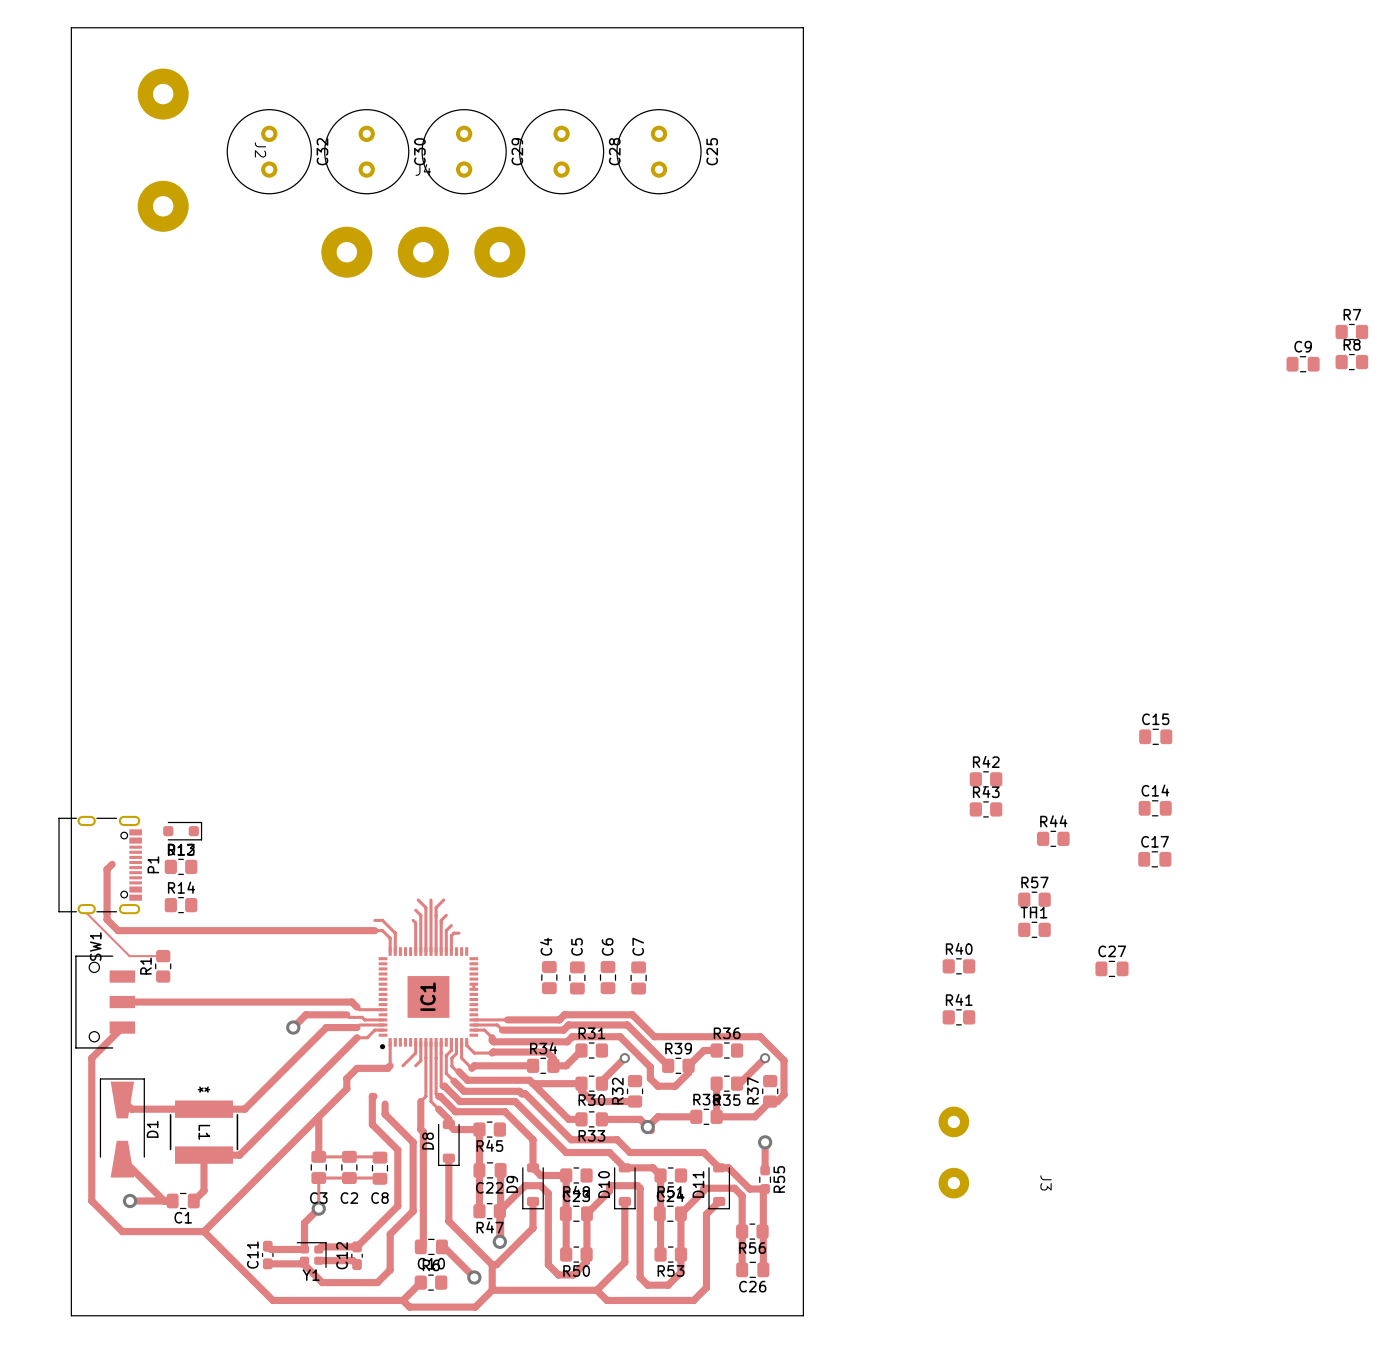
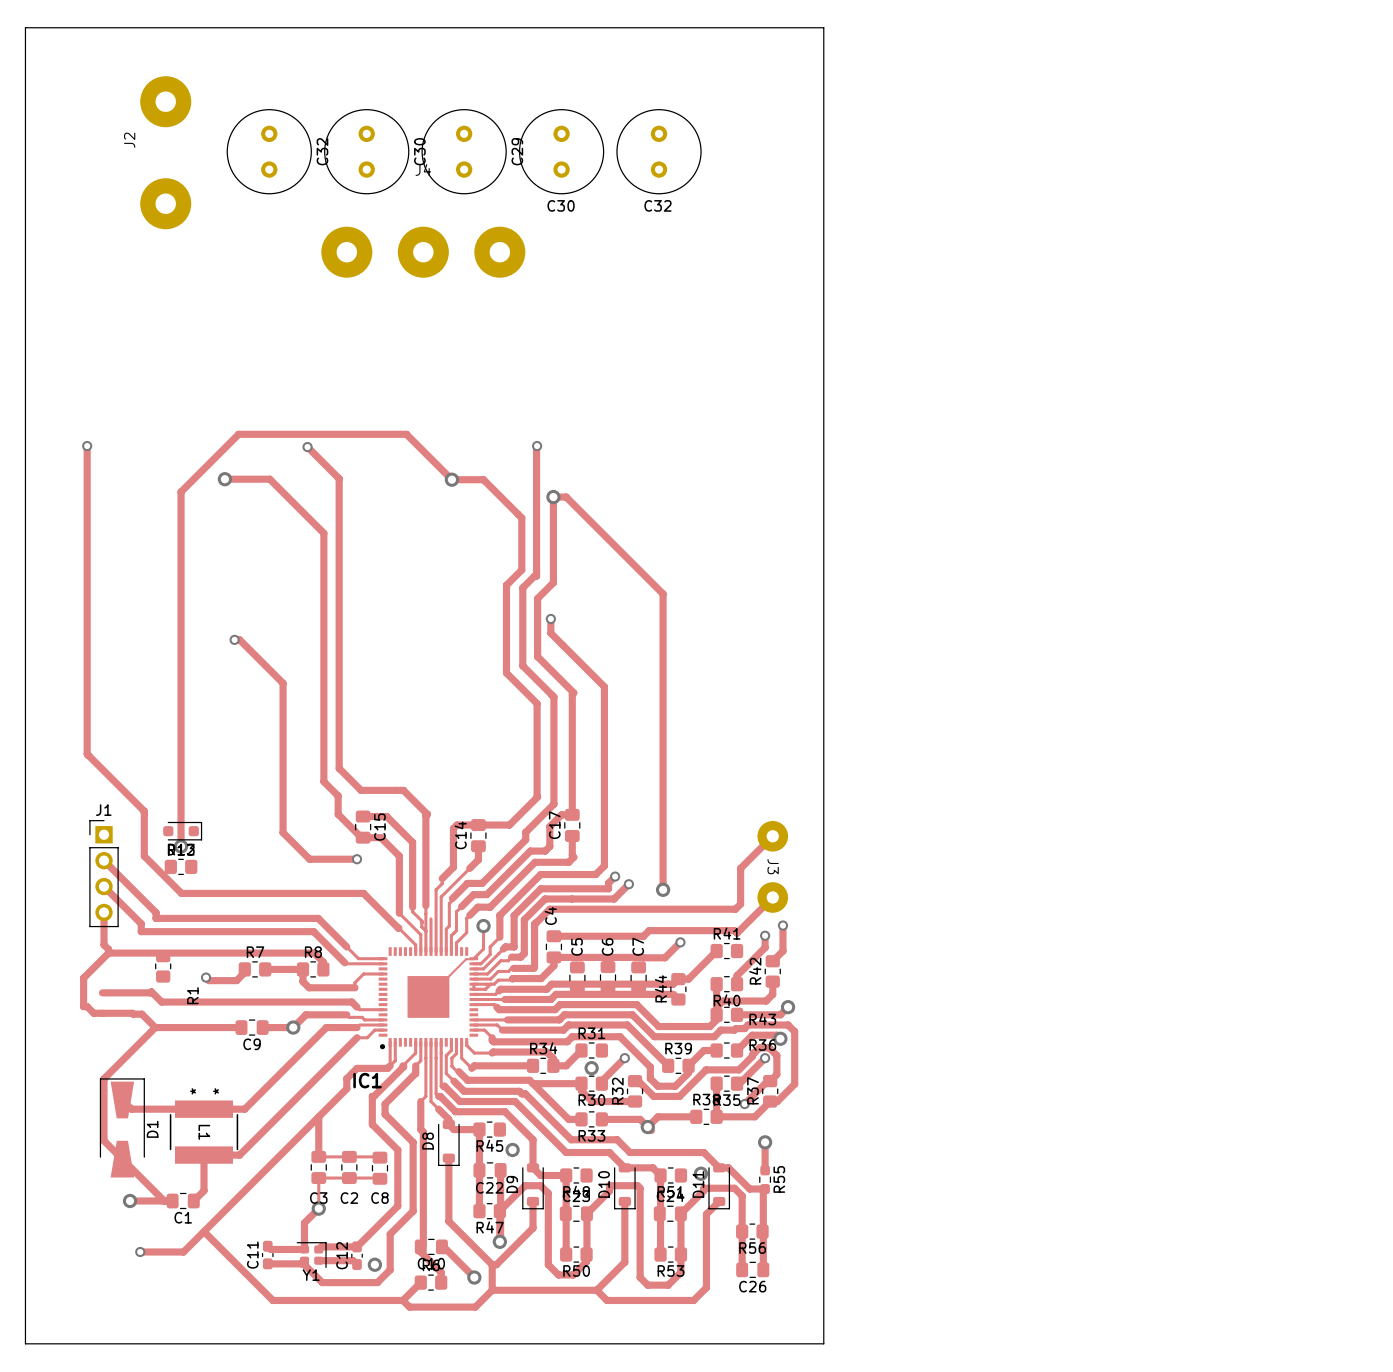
board edge: (71, 27) (71, 1315) (803, 1315) (803, 27) -> (71, 27) (25, 27) (25, 1343) (823, 1343) (823, 27) (803, 27)
J2 footprint: [137, 68, 189, 232] -> [140, 76, 192, 230]
J2 name rotation: 0° (260, 149) -> 180° (129, 140)
J2 name position: J2 (260, 149) -> J2 (129, 140)
C28 name: C28 (614, 151) -> C30 (561, 205)
C25 name: C25 (712, 151) -> C32 (657, 205)
R7 position: (1351, 331) -> (255, 969)
C9 name position: C9 (1303, 346) -> C9 (252, 1044)
R8 position: (1351, 362) -> (313, 969)
C9 position: (1303, 364) -> (252, 1027)
via: none -> (87, 446)
via: none -> (537, 446)
via: none -> (307, 447)
via: none -> (224, 479)
via: none -> (451, 479)
via: none -> (553, 497)
track: none -> (550, 618) (550, 633) (604, 686) (604, 865) (595, 874) (540, 874) (499, 915) (499, 937) (490, 946) (490, 954) (480, 963) (473, 963)
via: none -> (550, 618)
track: none -> (234, 639) (239, 639) (283, 683) (283, 832) (309, 859) (357, 859)
via: none -> (234, 639)
C15 rotation: 0° (1155, 736) -> 90° clockwise (363, 827)
C15 position: (1155, 736) -> (363, 827)
R42 name position: R42 (986, 761) -> R42 (755, 971)
R42 rotation: 0° (986, 779) -> 90° clockwise (772, 971)
R42 position: (986, 779) -> (772, 971)
C14 name position: C14 (1155, 790) -> C14 (460, 835)
R43 name position: R43 (986, 791) -> R43 (762, 1019)
C14 rotation: 0° (1155, 808) -> 90° clockwise (478, 835)
C14 position: (1155, 808) -> (478, 835)
R43 position: (986, 809) -> (726, 1014)
track: none -> (363, 816) (386, 816) (412, 842) (412, 911) (422, 921) (421, 927) (425, 931)
R44 name position: R44 (1053, 821) -> R44 (660, 988)
track: none -> (572, 836) (573, 857) (568, 862) (535, 862) (490, 907) (477, 907) (466, 918) (466, 932) (456, 942) (456, 951)
track: none -> (772, 836) (740, 868) (740, 904) (735, 909) (549, 909) (534, 924) (533, 968) (511, 968) (508, 971) (498, 971) (490, 979) (473, 979)
R44 rotation: 0° (1053, 838) -> 90° clockwise (678, 989)
R44 position: (1053, 838) -> (678, 989)
C17 name position: C17 (1155, 841) -> C17 (554, 825)
via: none -> (181, 846)
via: none -> (357, 859)
C17 rotation: 0° (1154, 859) -> 90° clockwise (572, 825)
C17 position: (1154, 859) -> (572, 825)
track: none -> (104, 860) (156, 912) (156, 918) (318, 918) (358, 958) (383, 958)
track: (112, 864) (107, 869) (107, 919) (118, 930) (382, 930) (390, 938) (390, 951) -> none
P1: (100, 865) -> none
J1: none -> (104, 873)
track: none -> (615, 876) (608, 883) (608, 888) (540, 888) (514, 915) (514, 946) (505, 946) (483, 968) (473, 968)
via: none -> (615, 876)
track: none -> (628, 884) (614, 899) (545, 899) (524, 919) (524, 953) (520, 957) (511, 957) (508, 960) (500, 960) (487, 974) (473, 974)
via: none -> (628, 884)
track: none -> (104, 886) (141, 923) (141, 931) (313, 931) (345, 963) (383, 963)
via: none -> (663, 889)
track: none -> (772, 897) (737, 933) (734, 930) (649, 930) (643, 936) (553, 936)
R57: (1034, 899) -> none
track: (418, 900) (425, 907) -> (307, 447) (339, 478) (339, 768) (361, 790) (403, 790) (427, 814) (425, 815) (425, 907)
track: (430, 900) (430, 918) -> none
track: (443, 900) (436, 907) -> (181, 846) (181, 491) (238, 434) (406, 434) (451, 479) (483, 479) (521, 517) (521, 569) (506, 585) (506, 673) (537, 703) (537, 796) (509, 825) (457, 825) (453, 828) (453, 867) (442, 878) (442, 883) (436, 889) (436, 907)
R14: (181, 905) -> none
track: (86, 909) (86, 913) (129, 956) (163, 956) -> none
track: (415, 910) (420, 915) (420, 934) -> (224, 479) (269, 479) (323, 533) (323, 781) (338, 795) (338, 814) (361, 837) (380, 837) (399, 856) (399, 913) (420, 934)
track: none -> (104, 912) (104, 944) (108, 949) (108, 953)
track: (446, 915) (441, 920) -> (478, 846) (478, 859) (441, 896) (441, 920)
track: (374, 920) (382, 920) (395, 933) (395, 951) -> none
track: (413, 920) (415, 922) (415, 944) -> (87, 446) (87, 754) (144, 811) (144, 856) (181, 893) (363, 893) (415, 944)
track: (451, 925) (446, 930) -> (537, 446) (536, 576) (522, 587) (522, 665) (553, 697) (553, 804) (525, 832) (525, 839) (482, 883) (467, 883) (452, 898) (449, 903) (449, 926) (446, 930)
track: none -> (782, 925) (782, 951) (772, 961)
via: none -> (782, 925)
track: none -> (483, 926) (483, 949) (473, 959) (466, 959) (428, 996)
via: none -> (483, 926)
TH1: (1034, 929) -> none
track: (453, 933) (459, 933) -> (453, 933) (456, 930) (456, 911) (473, 894) (486, 894) (530, 851) (545, 851) (549, 846) (549, 826) (561, 814) (572, 814) (572, 694) (573, 692) (537, 656) (537, 598) (553, 582) (553, 497) (566, 497) (663, 593) (663, 889)
track: none -> (765, 935) (765, 947) (737, 975) (737, 984)
via: none -> (765, 935)
track: none -> (680, 942) (665, 957) (553, 957) (553, 965) (541, 978) (512, 978) (498, 980) (494, 984) (473, 984)
via: none -> (680, 942)
R40 name position: R40 (959, 948) -> R40 (727, 1000)
track: none -> (716, 951) (688, 979) (678, 979) (673, 984) (551, 984) (546, 989) (500, 989) (495, 994) (473, 994)
track: none -> (108, 953) (83, 978) (83, 1006) (87, 1006) (93, 1013) (141, 1014) (155, 1027)
track: none -> (108, 953) (314, 953) (323, 962) (323, 969)
R1 name position: R1 (145, 966) -> R1 (192, 995)
R40 position: (958, 966) -> (726, 984)
C27: (1111, 968) -> none
track: none -> (244, 969) (244, 972) (236, 980) (209, 980) (206, 977)
track: none -> (265, 969) (302, 969) (302, 981) (309, 987) (354, 987) (354, 982) (363, 974) (383, 974)
via: none -> (206, 977)
C4 position: (549, 977) -> (553, 946)
track: none -> (772, 981) (772, 994) (766, 1001) (723, 1001) (716, 1007)
track: none -> (490, 984) (485, 989) (473, 989)
track: none -> (716, 984) (716, 1019) (710, 1026) (658, 1026) (636, 1004) (560, 1004) (555, 1009) (499, 1009) (494, 1004) (473, 1004)
IC1 name rotation: 0° (427, 996) -> 90° clockwise (367, 1080)
IC1 name position: IC1 (427, 996) -> IC1 (367, 1080)
track: none -> (473, 999) (550, 999) (556, 994) (673, 994) (678, 999)
SW1: (105, 1002) -> none
track: (122, 1002) (161, 1002) -> (102, 992) (151, 991) (161, 1002)
track: none -> (788, 1007) (780, 1014) (737, 1014)
via: none -> (788, 1007)
R41 position: (958, 1017) -> (726, 951)
track: (122, 1027) (91, 1058) (91, 1200) (122, 1231) (203, 1231) -> (140, 1252) (183, 1252) (203, 1231)
track: none -> (155, 1027) (241, 1027)
track: none -> (155, 1027) (104, 1078) (104, 1140) (122, 1159)
track: none -> (262, 1027) (293, 1027)
R36 name position: R36 (727, 1033) -> R36 (762, 1045)
track: (714, 1036) (760, 1036) (783, 1060) (783, 1094) -> (714, 1036) (720, 1030) (744, 1028) (748, 1025) (788, 1025) (794, 1031) (794, 1084) (783, 1094)
track: none -> (780, 1038) (776, 1035) (752, 1035) (737, 1050)
via: none -> (780, 1038)
track: none -> (395, 1042) (395, 1060) (390, 1065)
track: none -> (402, 1065) (374, 1096)
track: none -> (415, 1065) (415, 1073) (385, 1104)
via: none -> (591, 1068)
track: none -> (635, 1081) (638, 1081) (653, 1096) (679, 1096) (706, 1069) (738, 1069) (759, 1047) (769, 1047) (776, 1055) (776, 1074) (744, 1104)
L1 footprint: [169, 1100, 239, 1164] -> [169, 1100, 239, 1164]
via: none -> (744, 1104)
via: none -> (512, 1149)
J3 position: (953, 1152) -> (772, 866)
via: none -> (700, 1173)
J3 name position: J3 (1046, 1182) -> J3 (773, 866)
track: none -> (420, 1246) (420, 1252) (441, 1272) (441, 1282)
via: none -> (140, 1252)
via: none -> (374, 1264)

